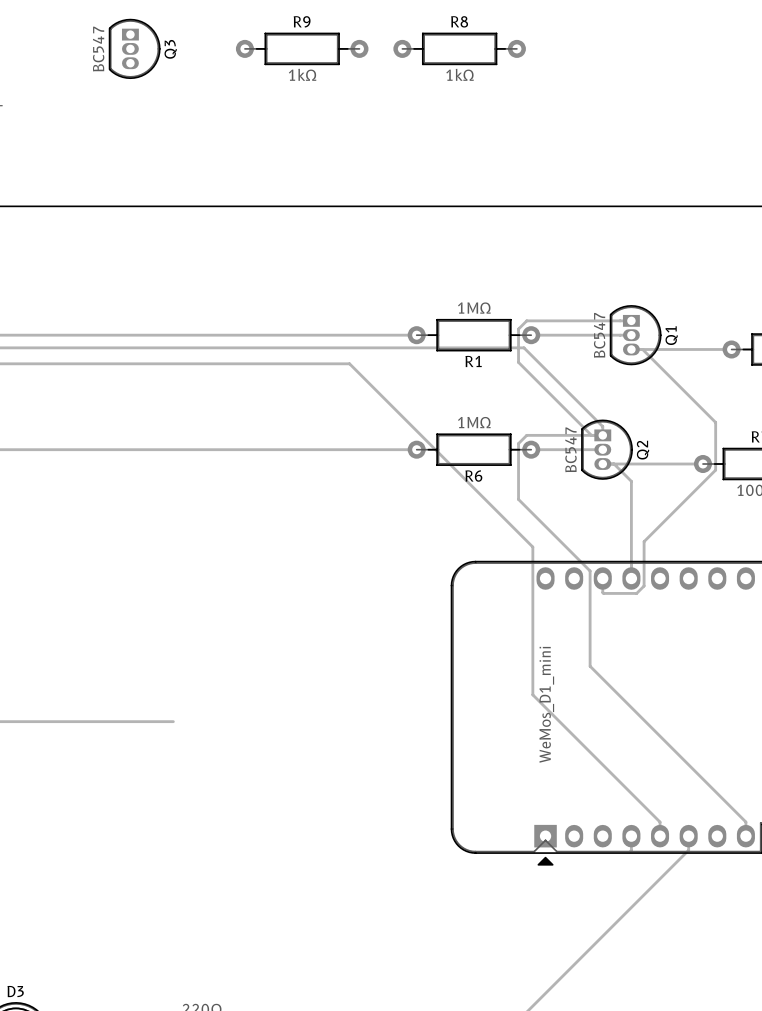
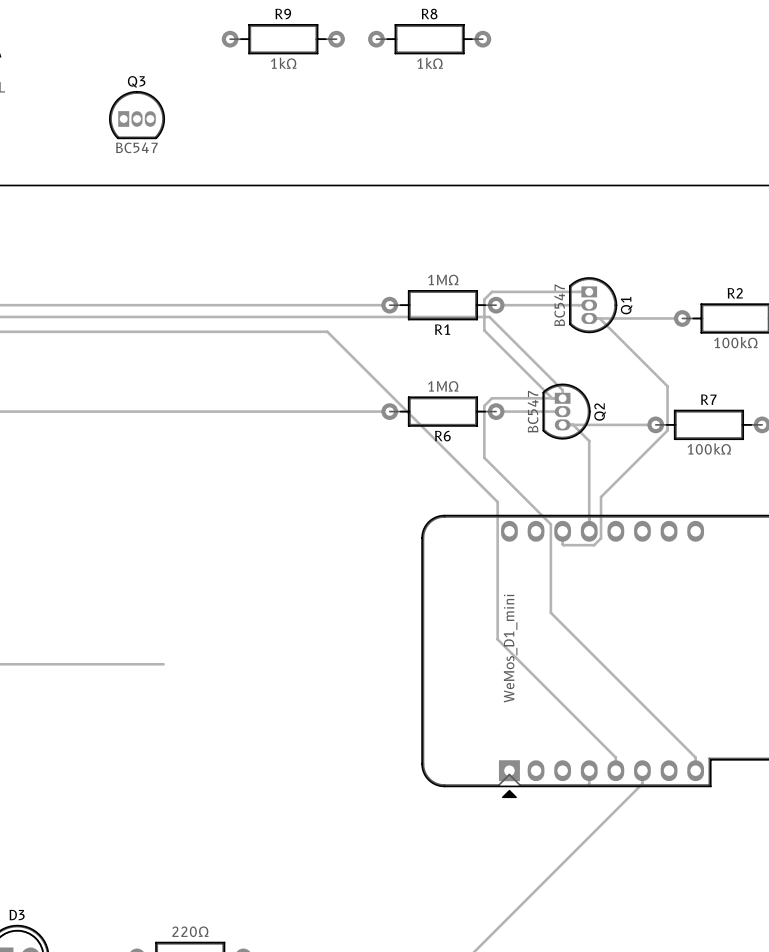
Q3 rotation: 0° (134, 48) -> 90° counterclockwise (137, 115)
Q3 position: (134, 48) -> (137, 115)

